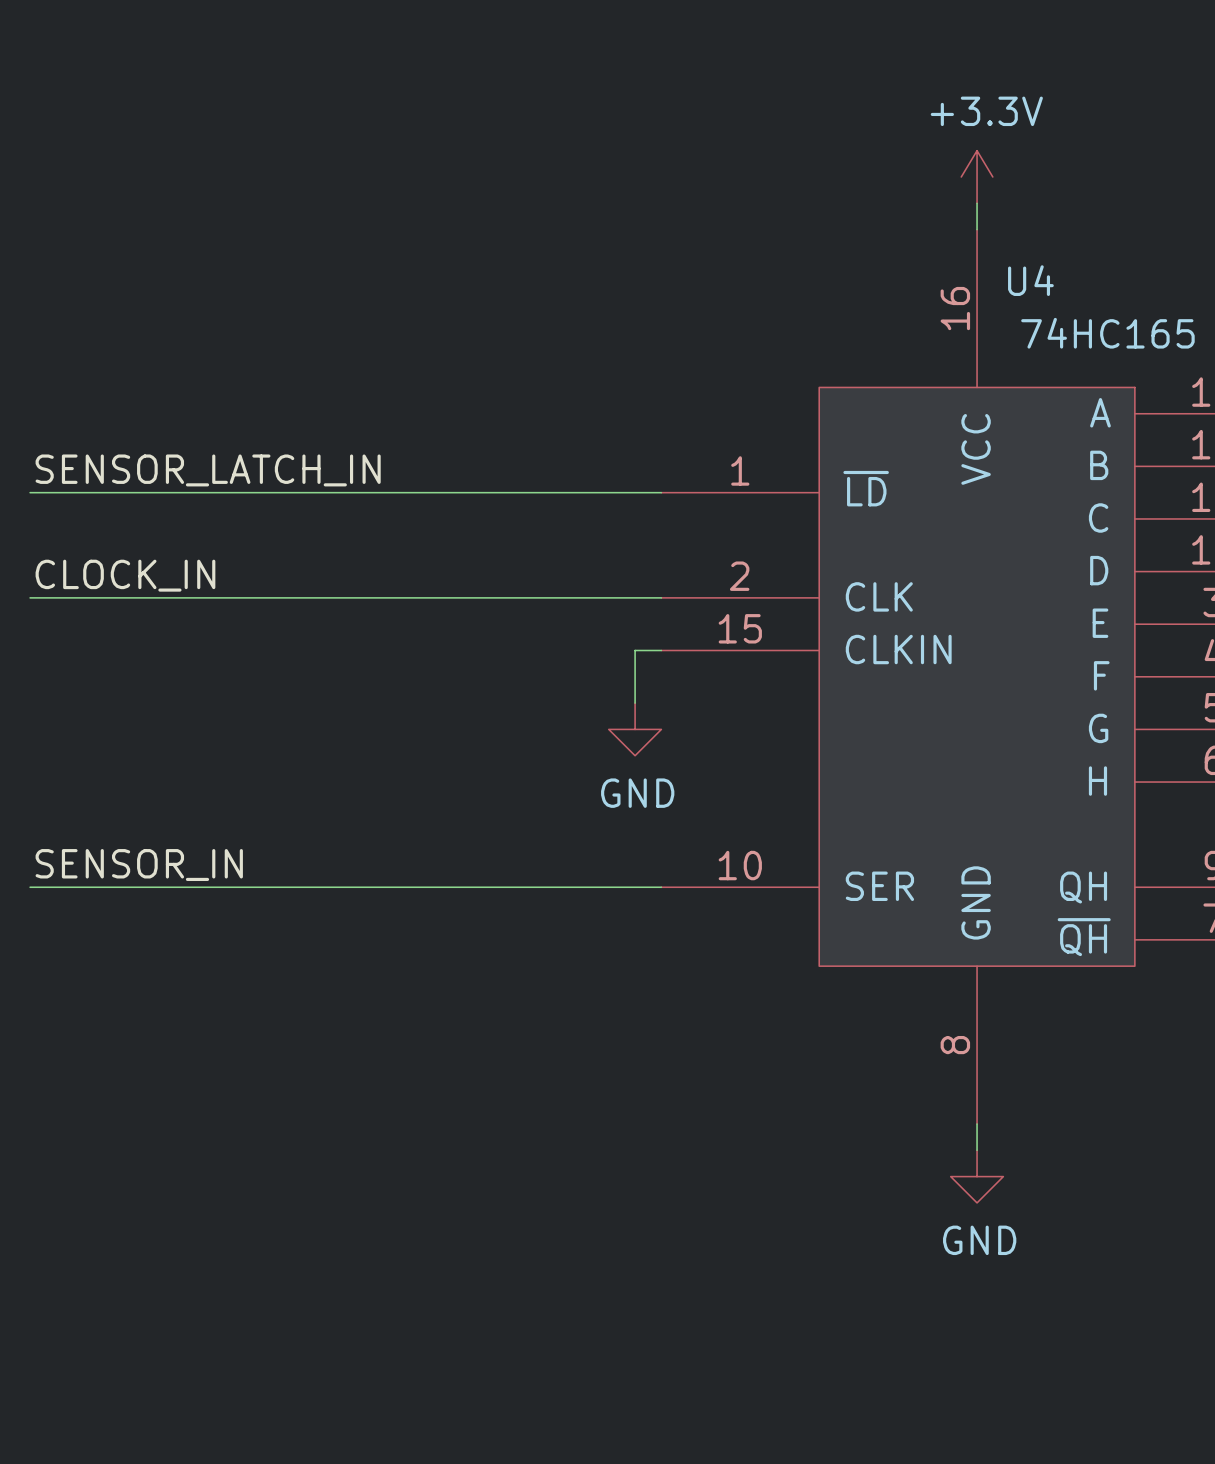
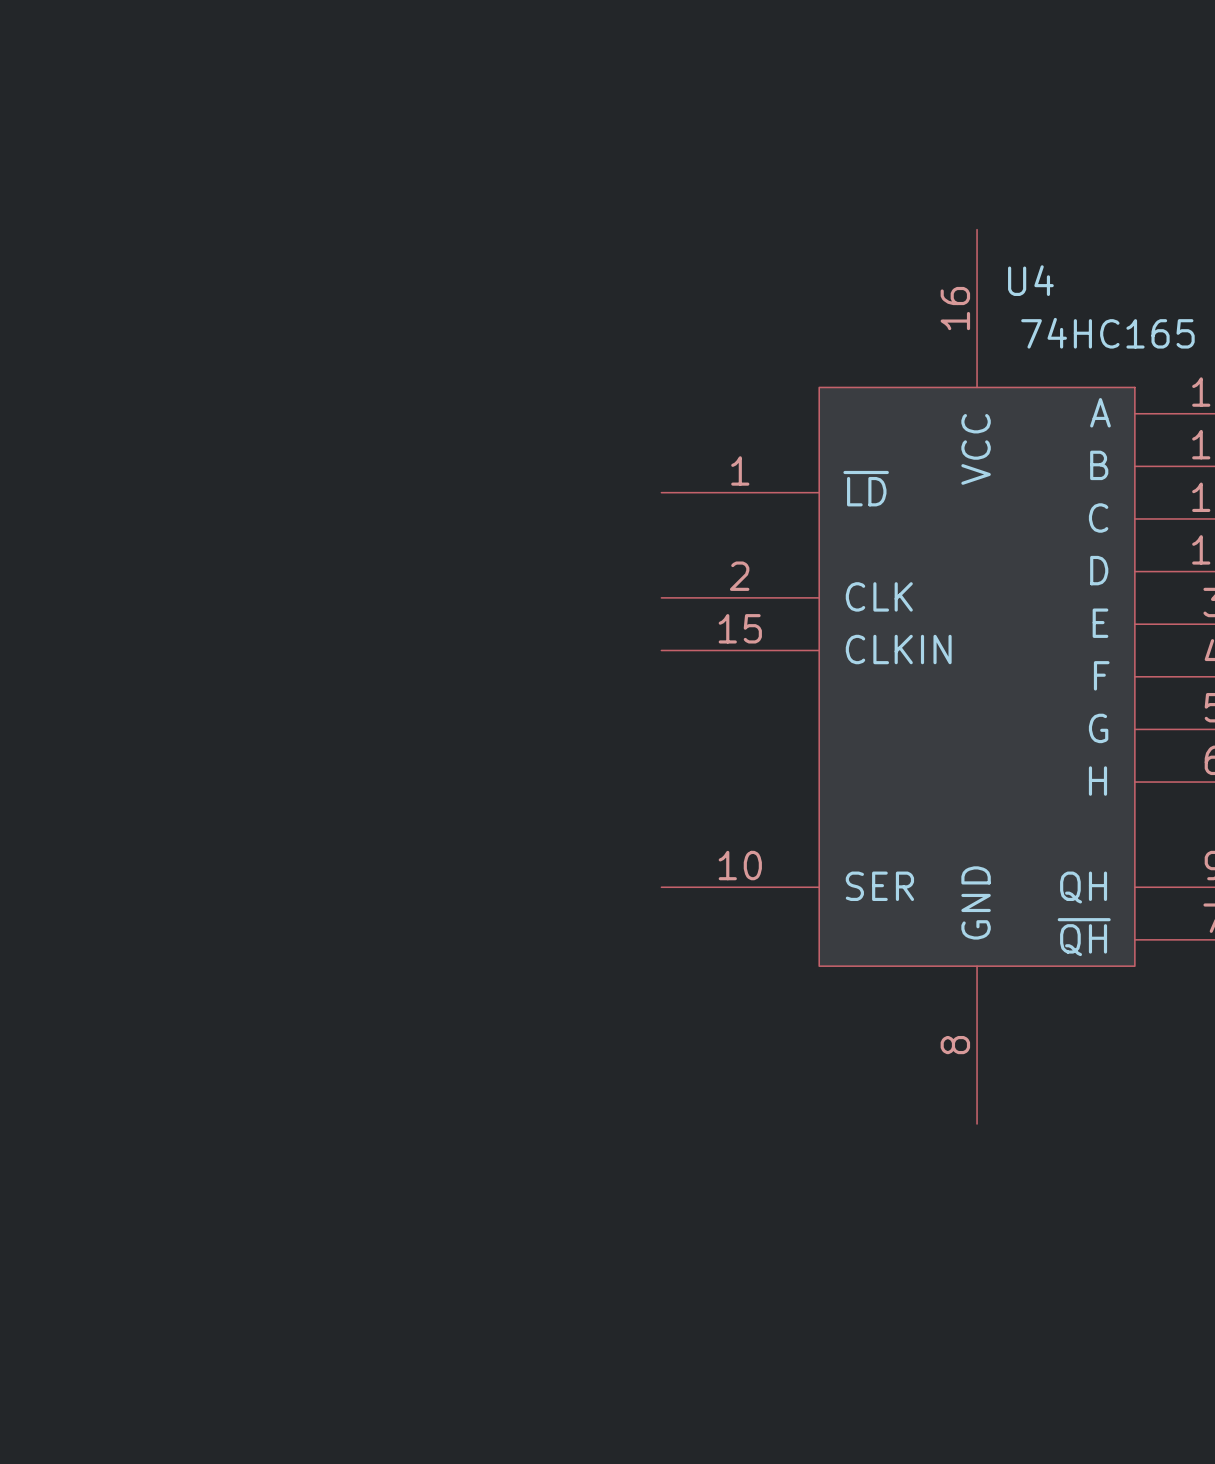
power symbol: +3.3V (977, 177) -> none
wire: (977, 203) (977, 229) -> none
label: SENSOR_LATCH_IN (208, 470) -> none
wire: (30, 492) (661, 492) -> none
label: CLOCK_IN (125, 575) -> none
wire: (30, 597) (661, 597) -> none
wire: (661, 650) (635, 650) (635, 703) -> none
power symbol: GND (635, 729) -> none
label: SENSOR_IN (139, 865) -> none
wire: (30, 887) (661, 887) -> none
wire: (977, 1123) (977, 1150) -> none
power symbol: GND (977, 1176) -> none

